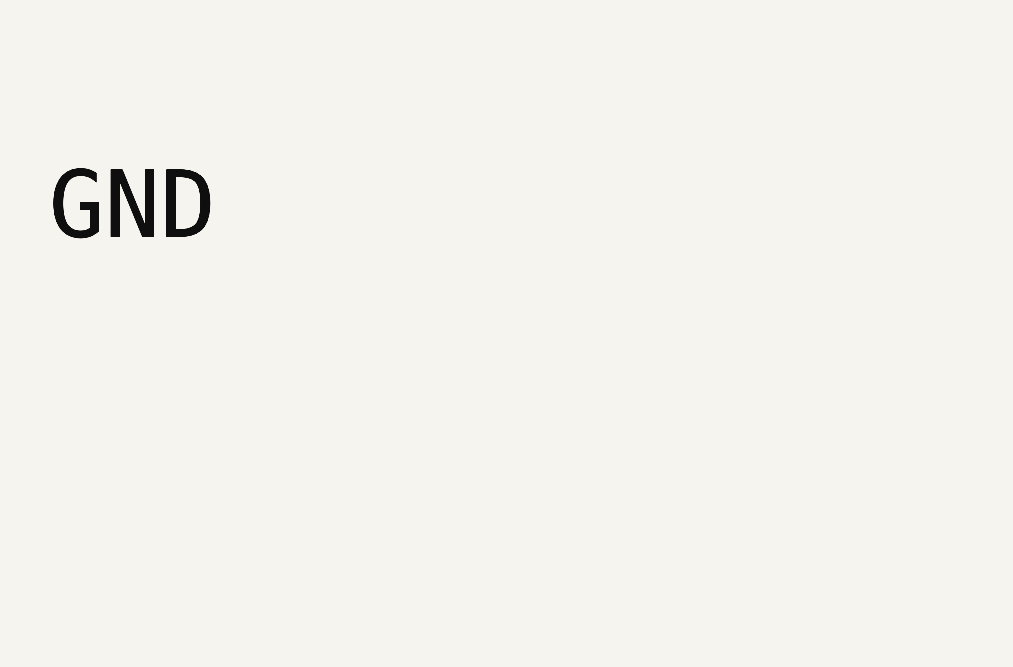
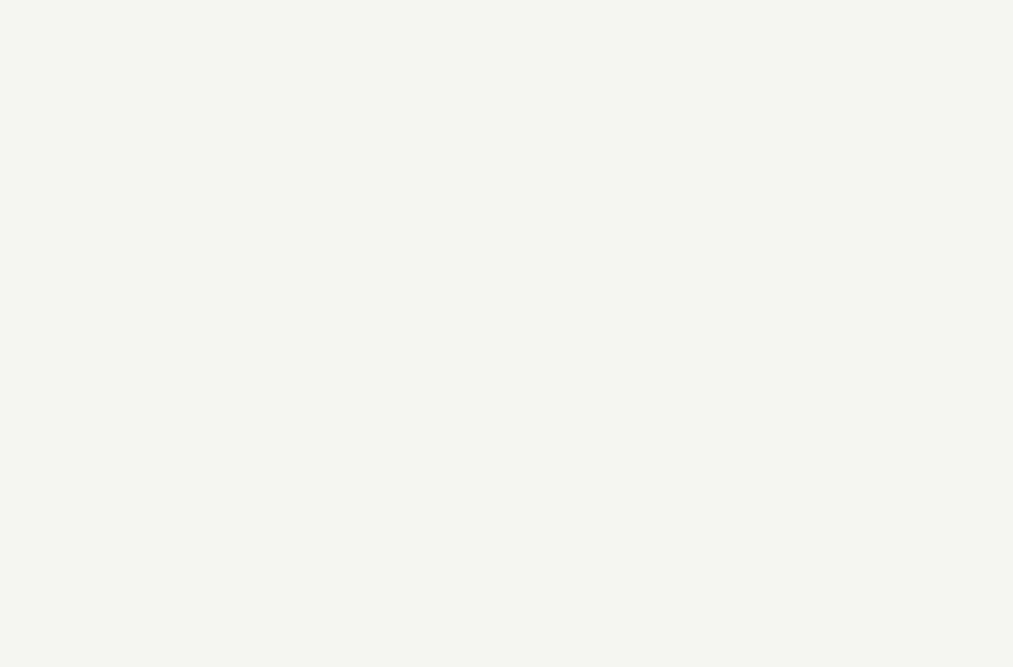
label: GND (131, 203) -> none

